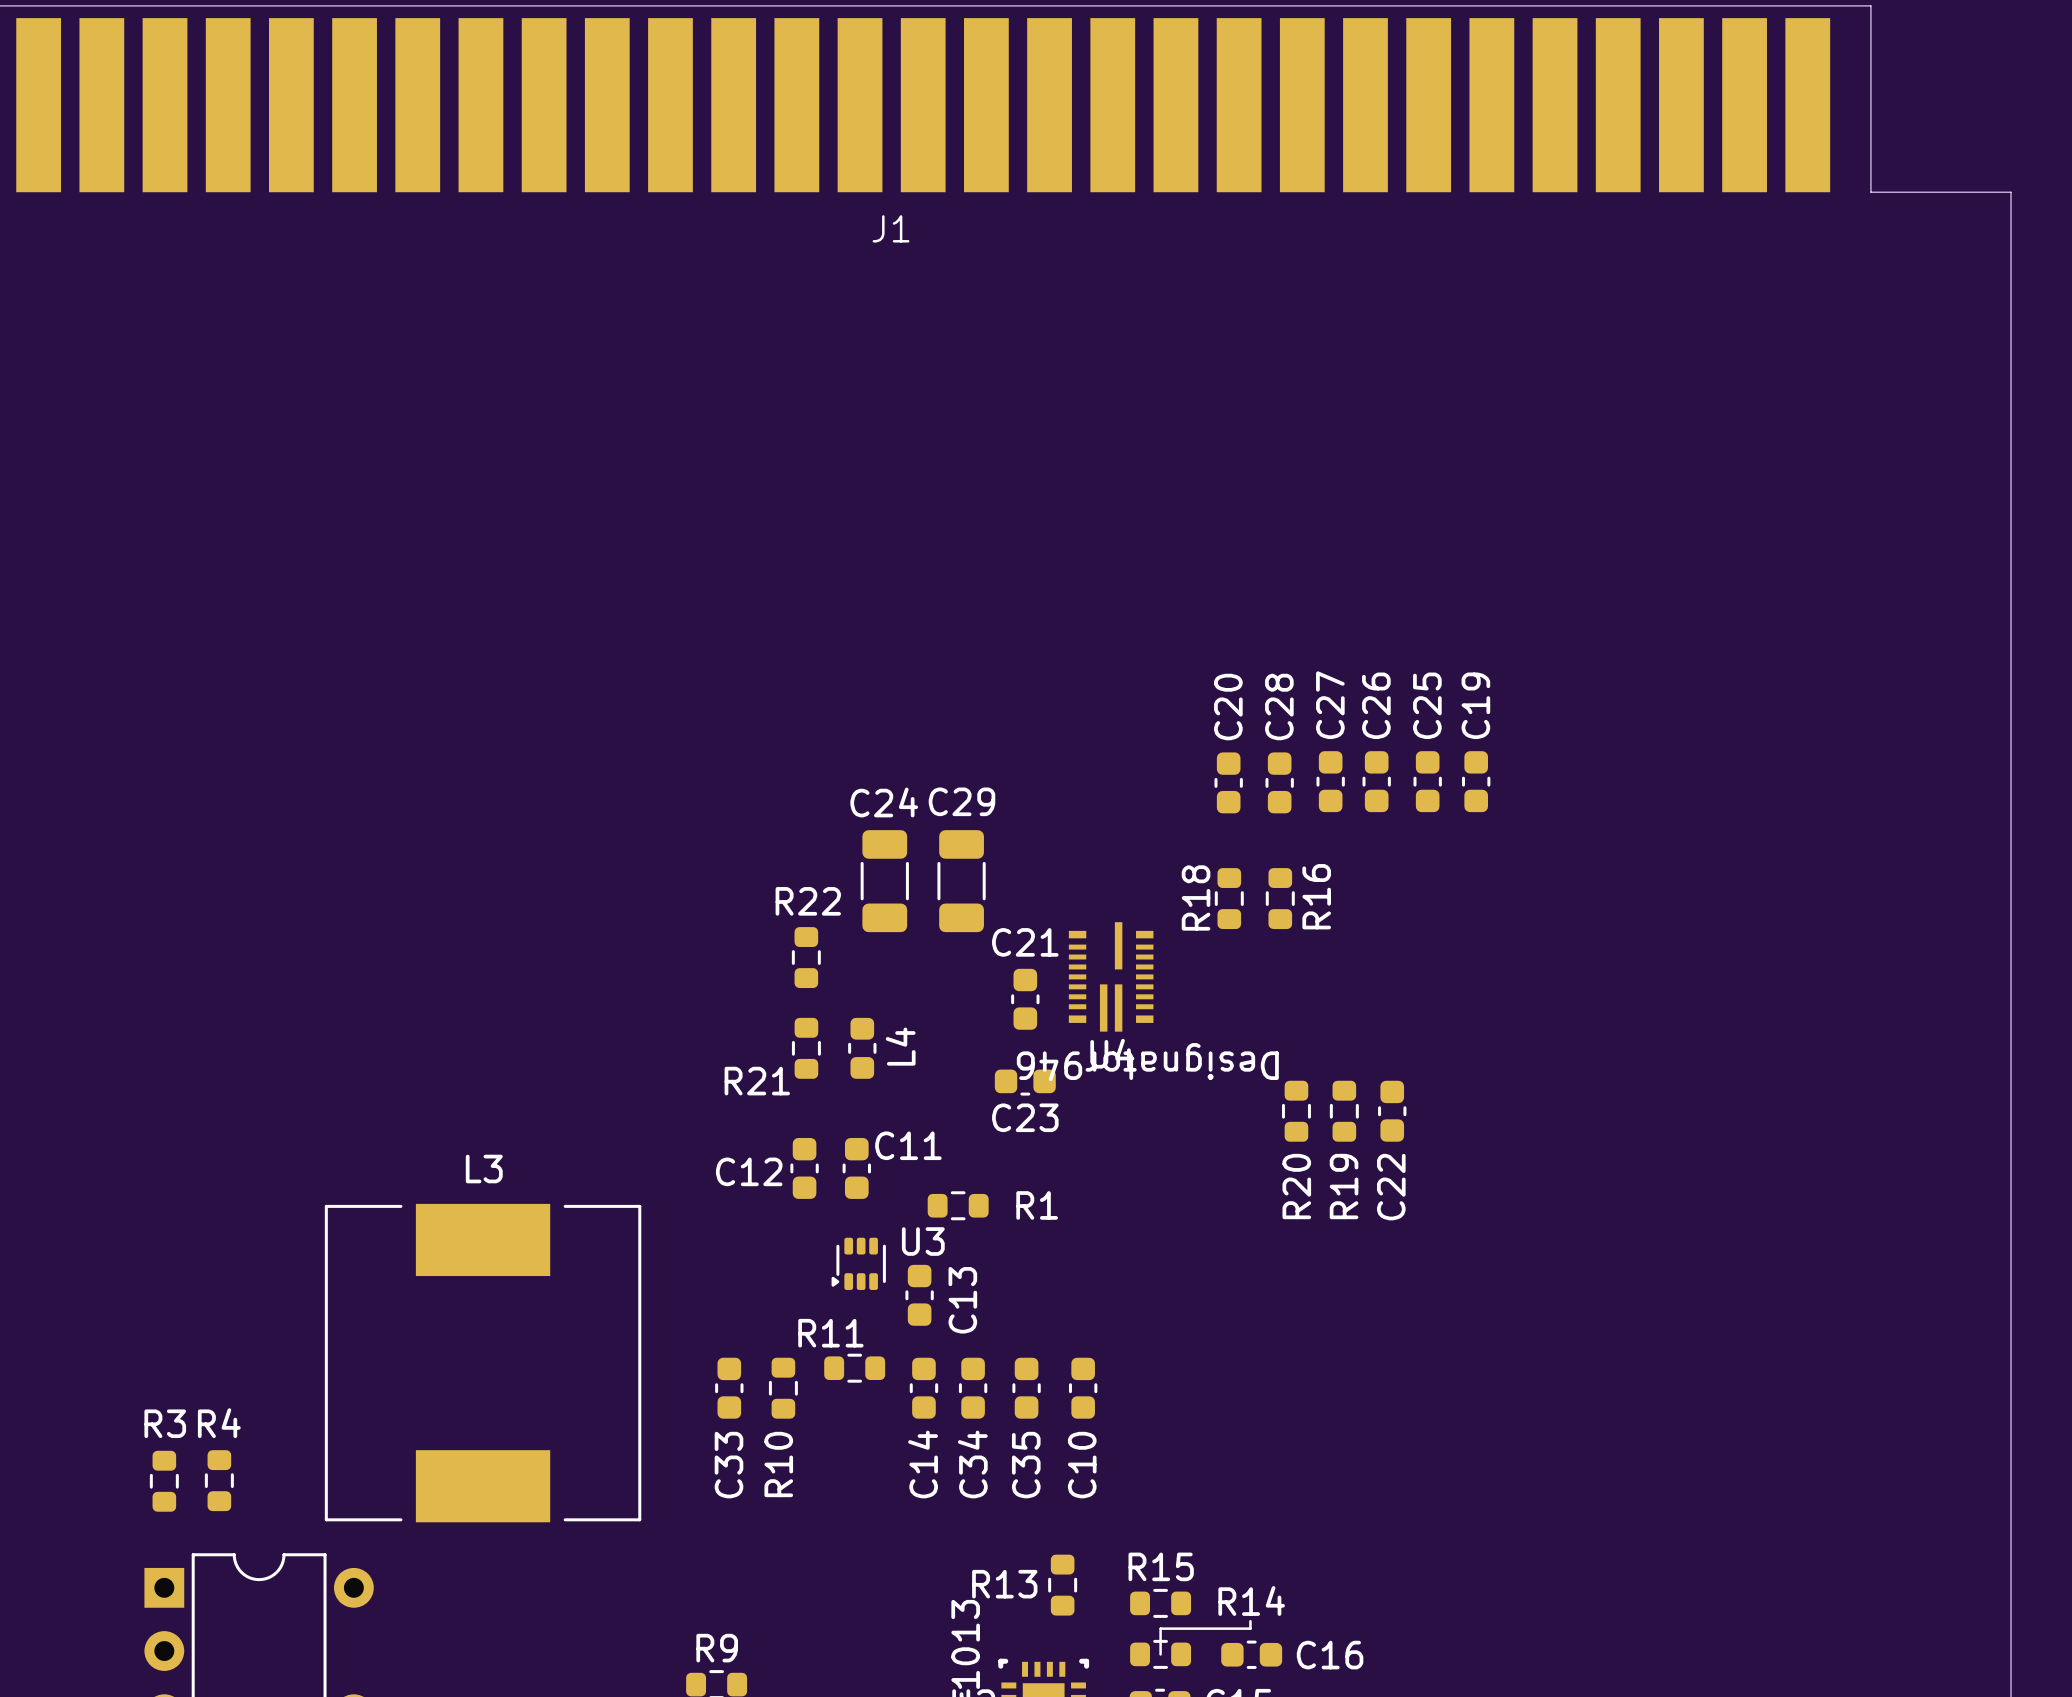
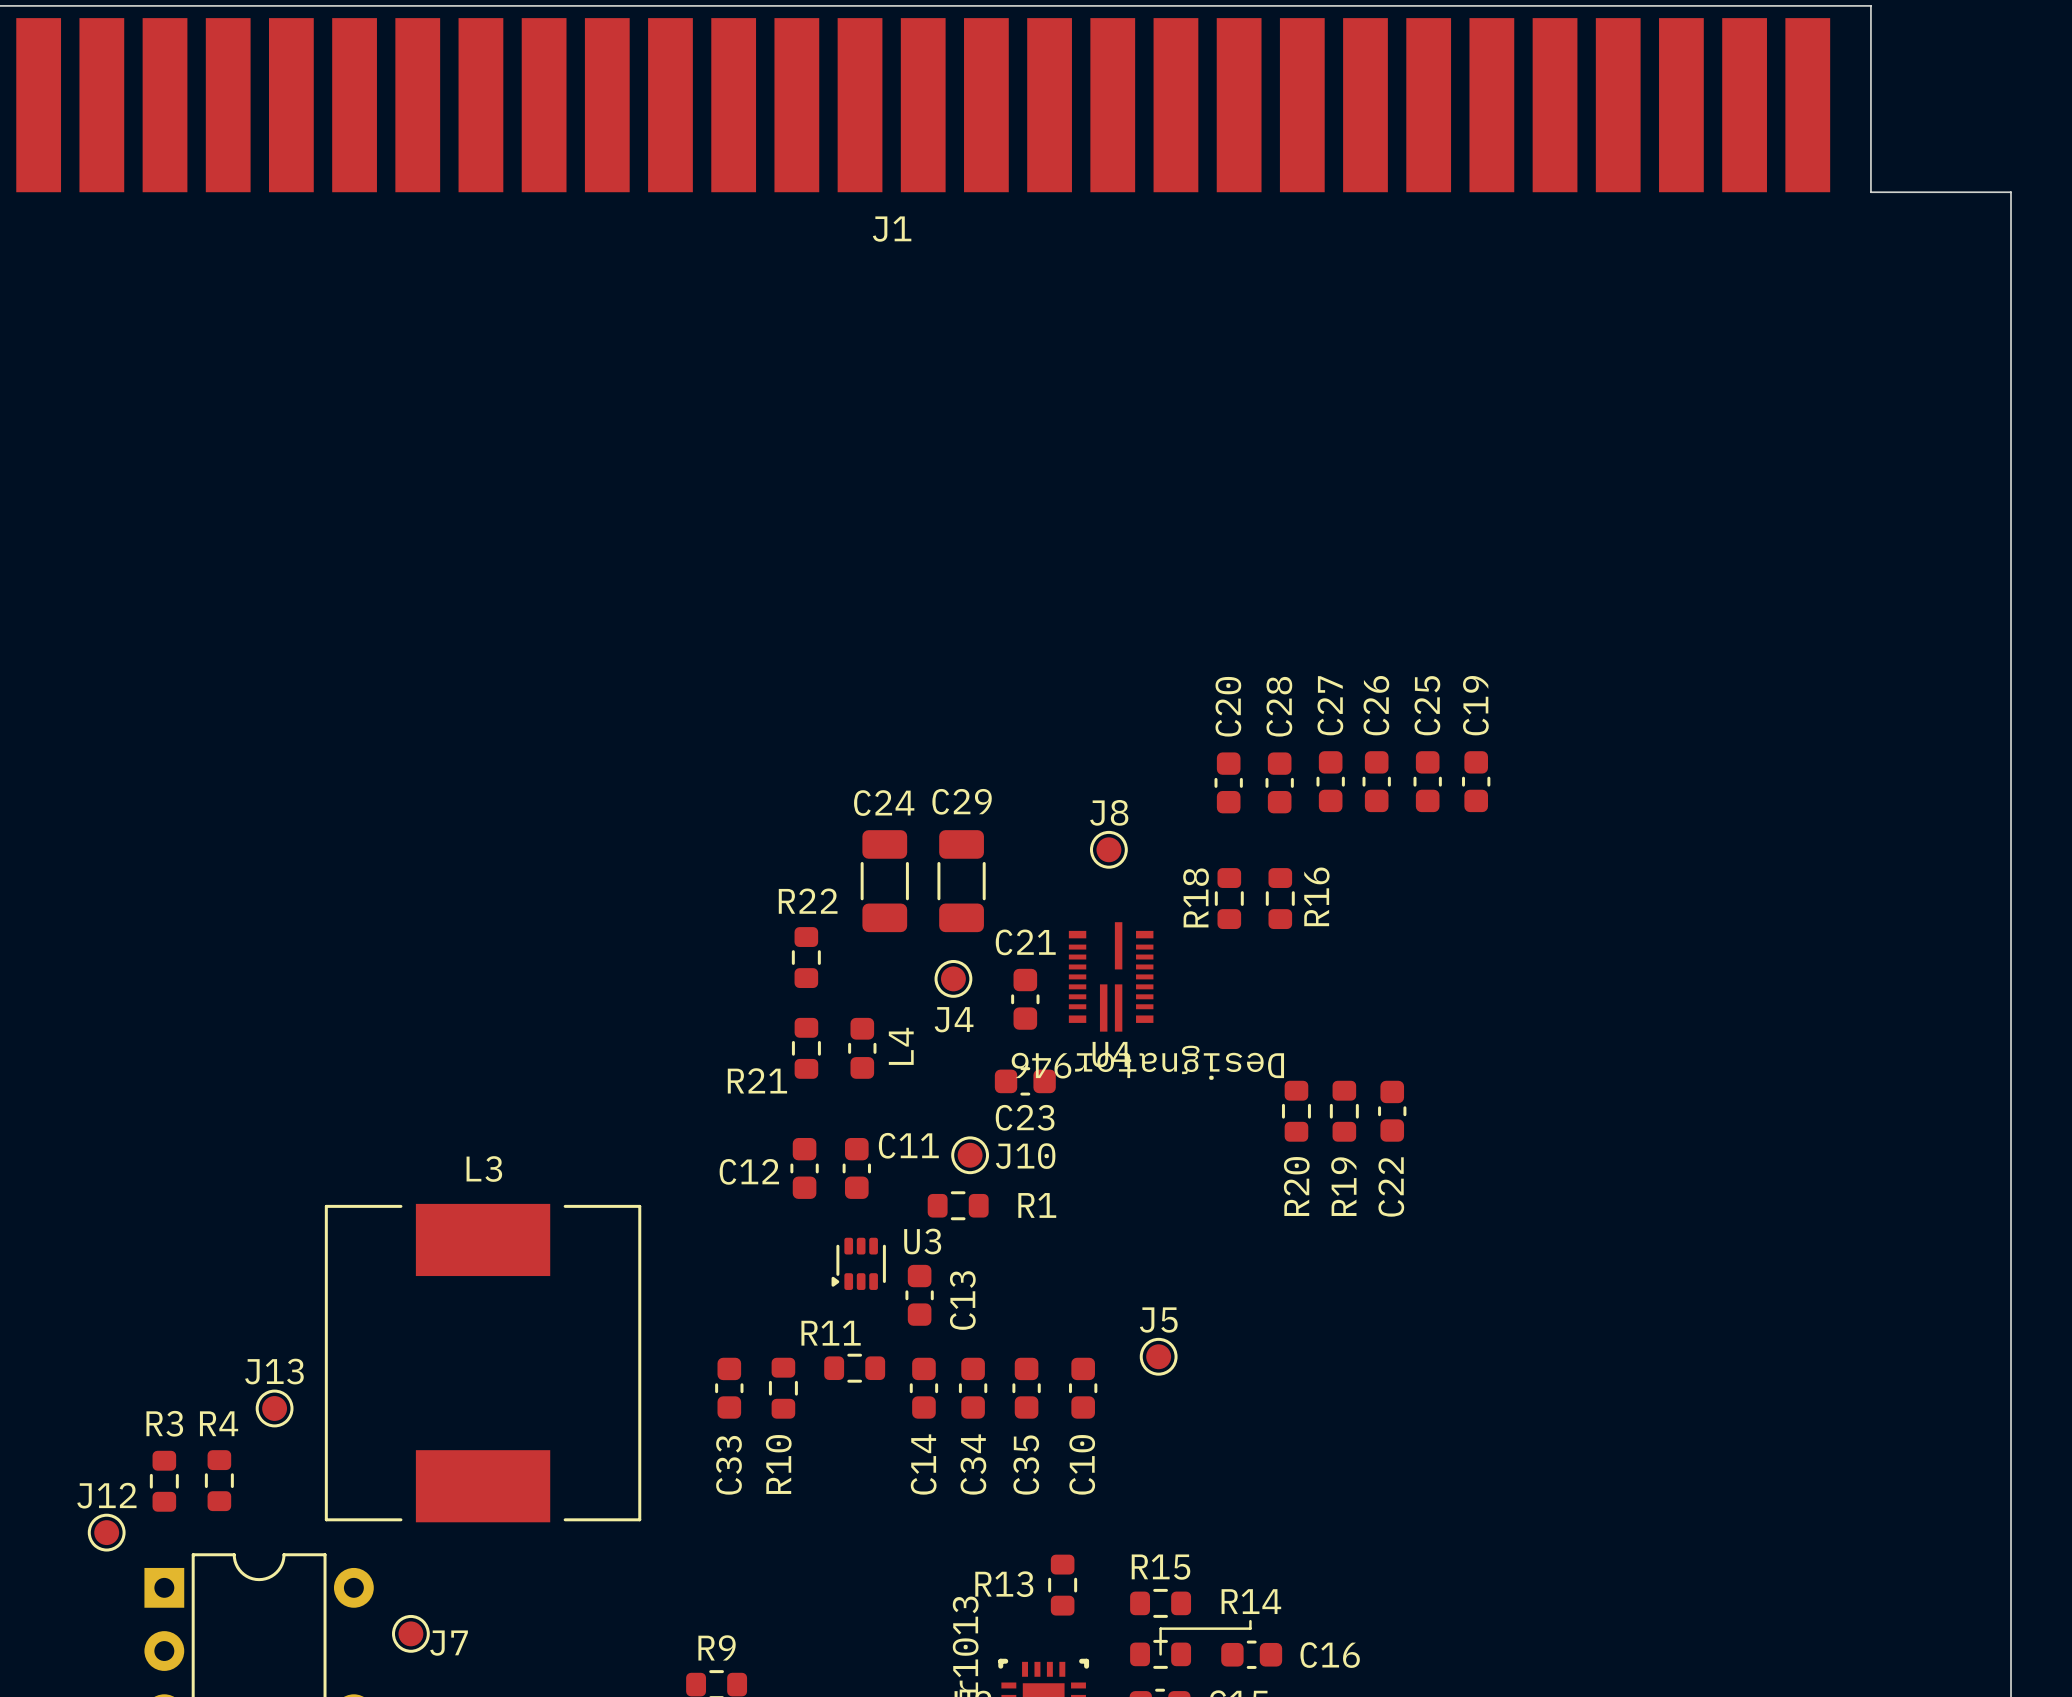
J8: none -> (1108, 849)
J4: none -> (953, 978)
J10: none -> (970, 1155)
J5: none -> (1158, 1356)
J13: none -> (274, 1408)
J12: none -> (106, 1532)
J7: none -> (410, 1633)

